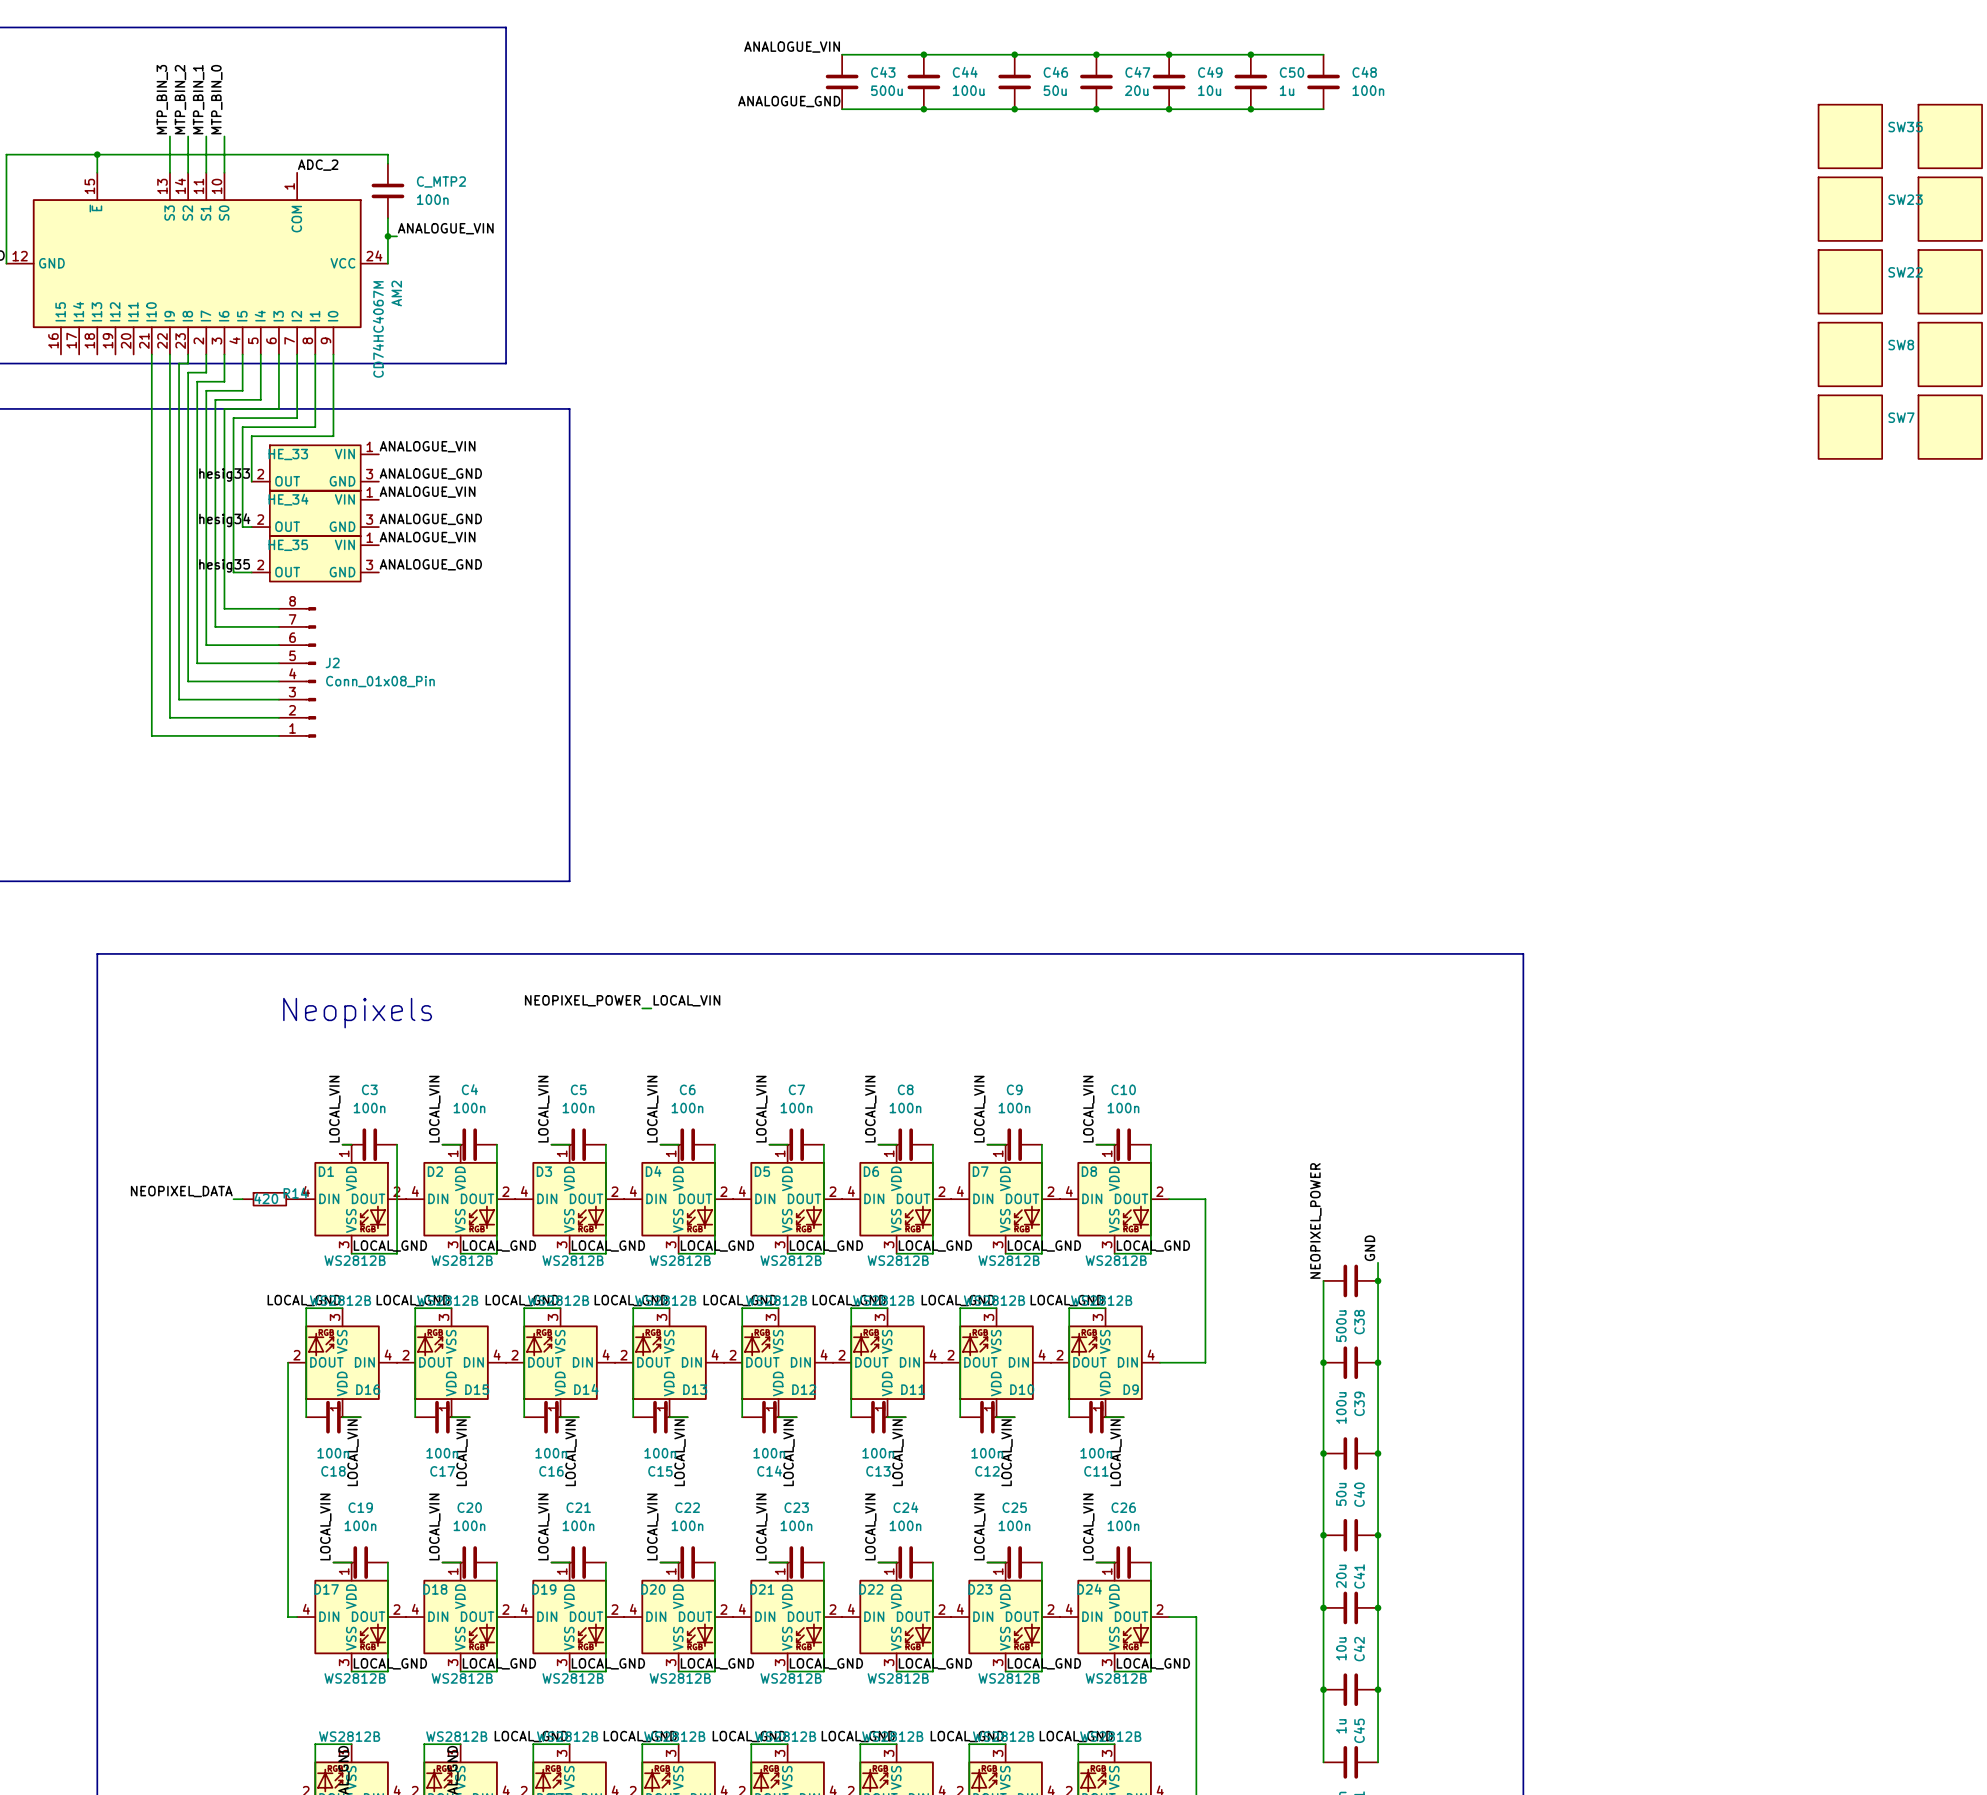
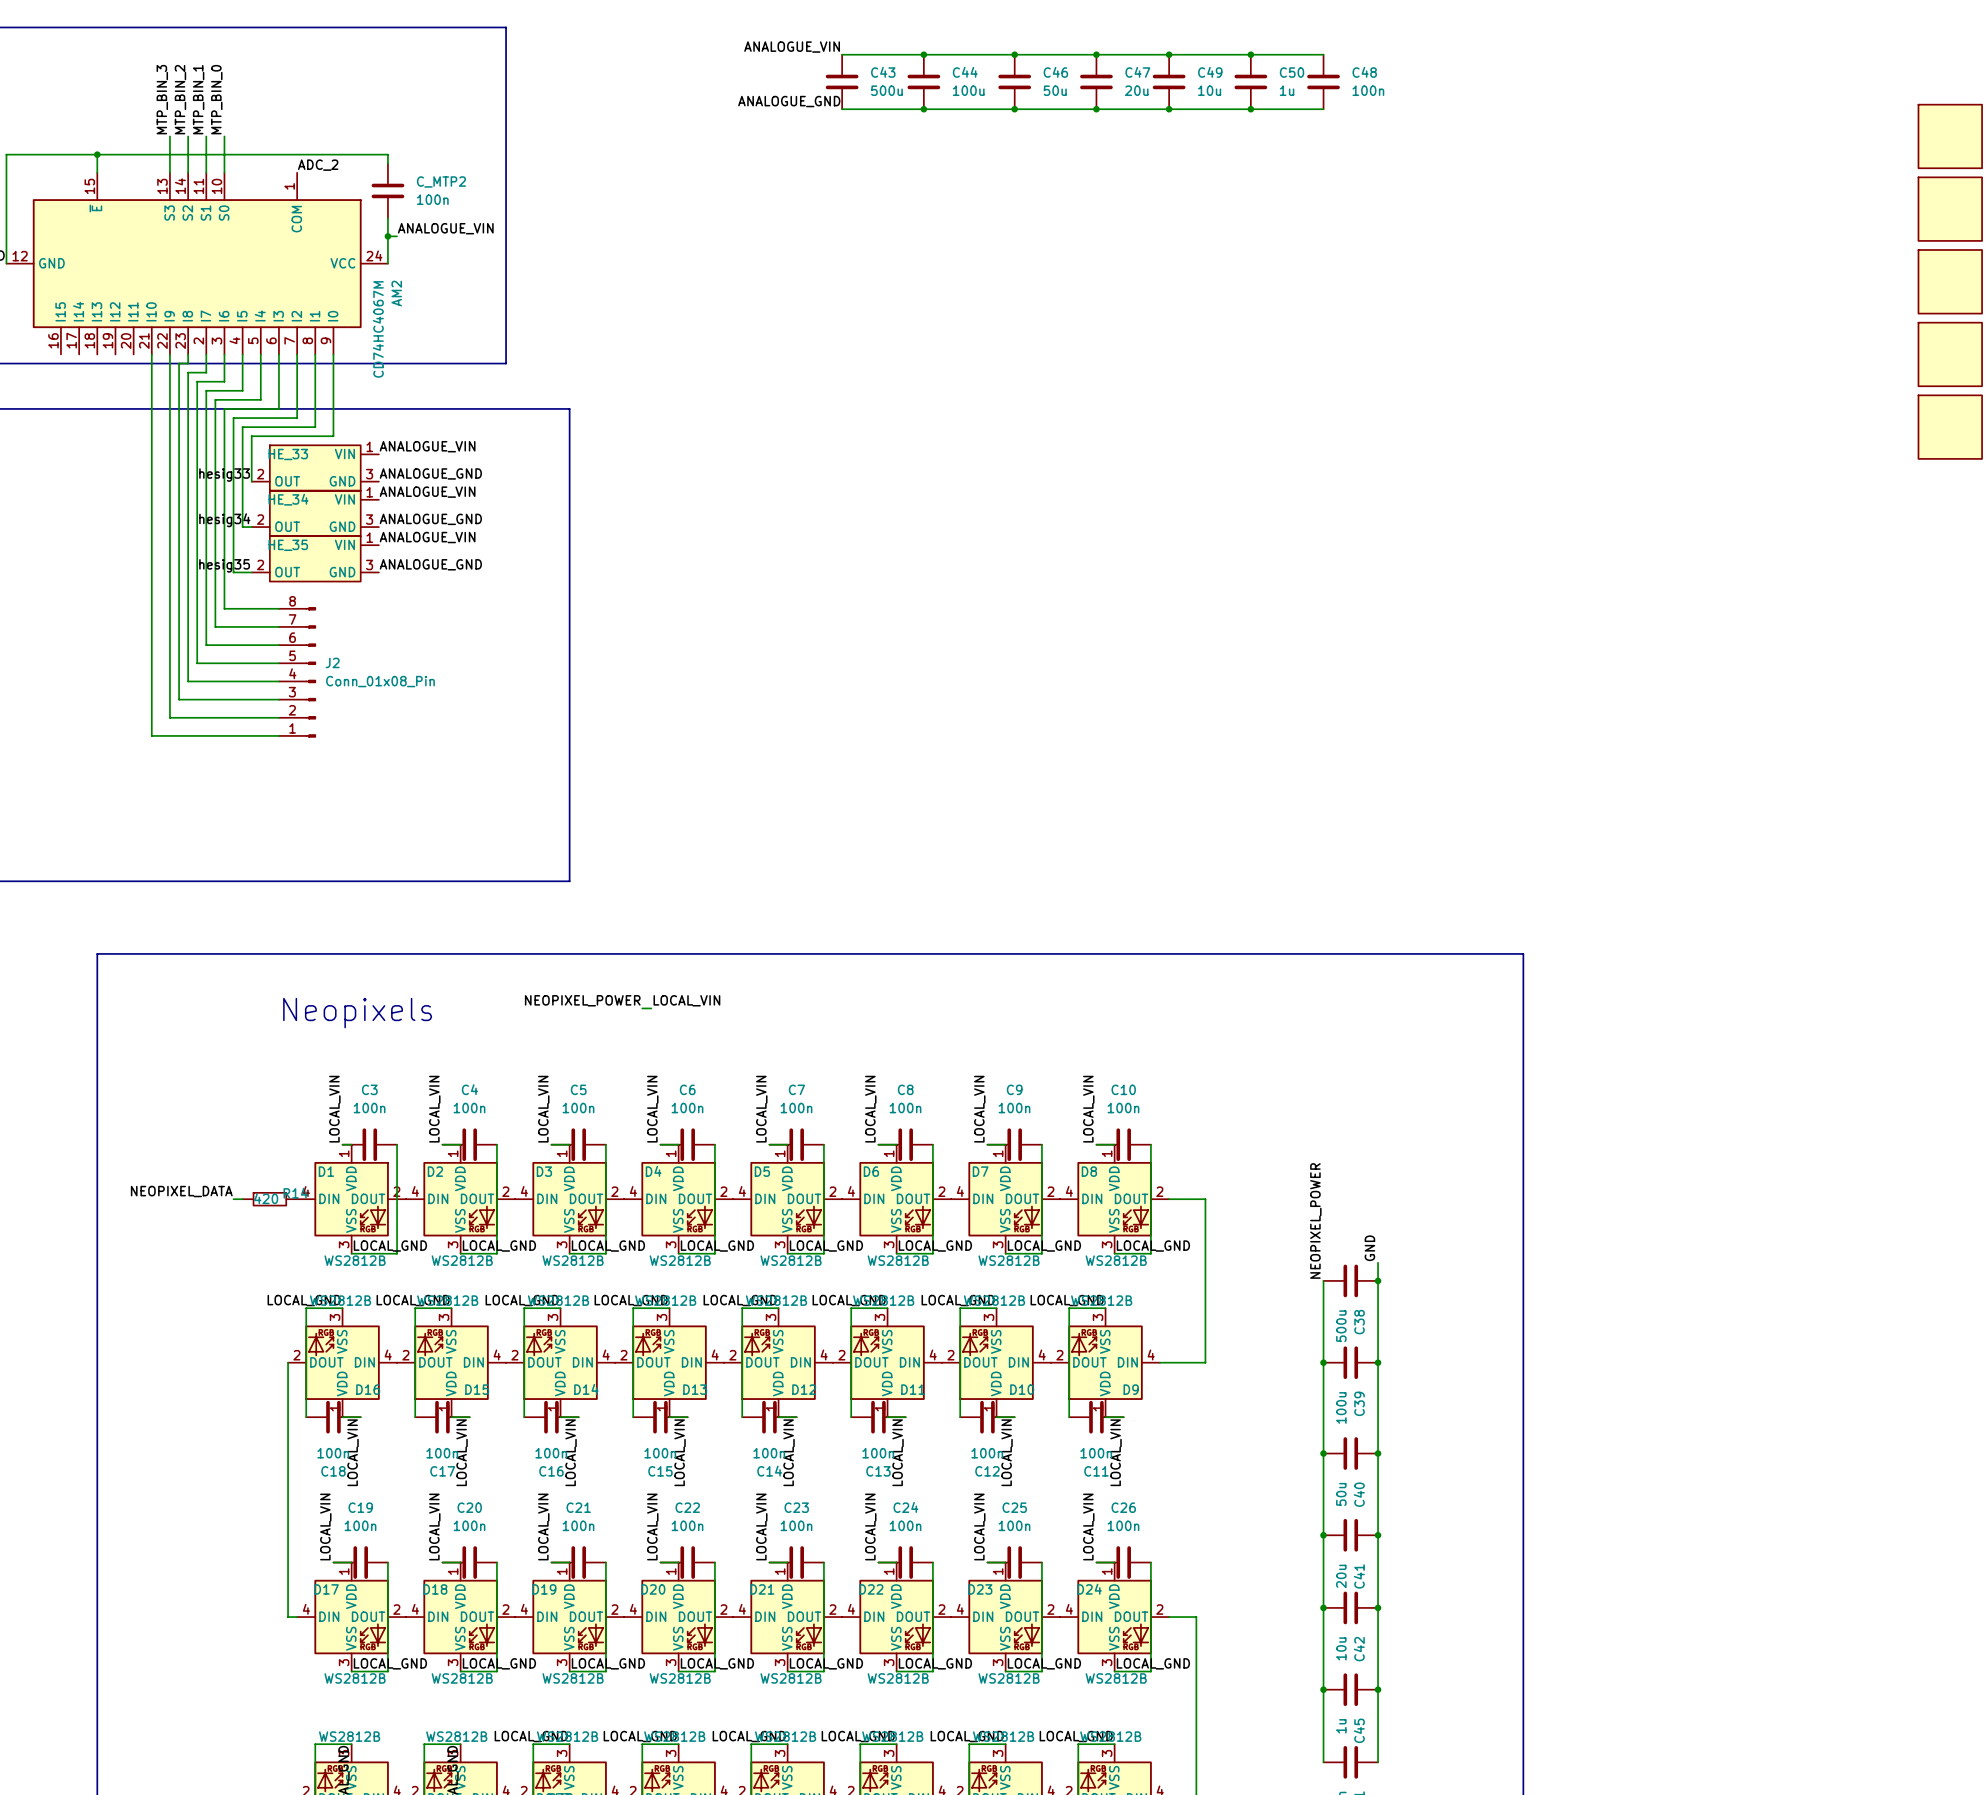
SW35: (1850, 136) -> none
SW23: (1850, 209) -> none
SW22: (1850, 281) -> none
SW8: (1850, 354) -> none
SW7: (1850, 427) -> none

